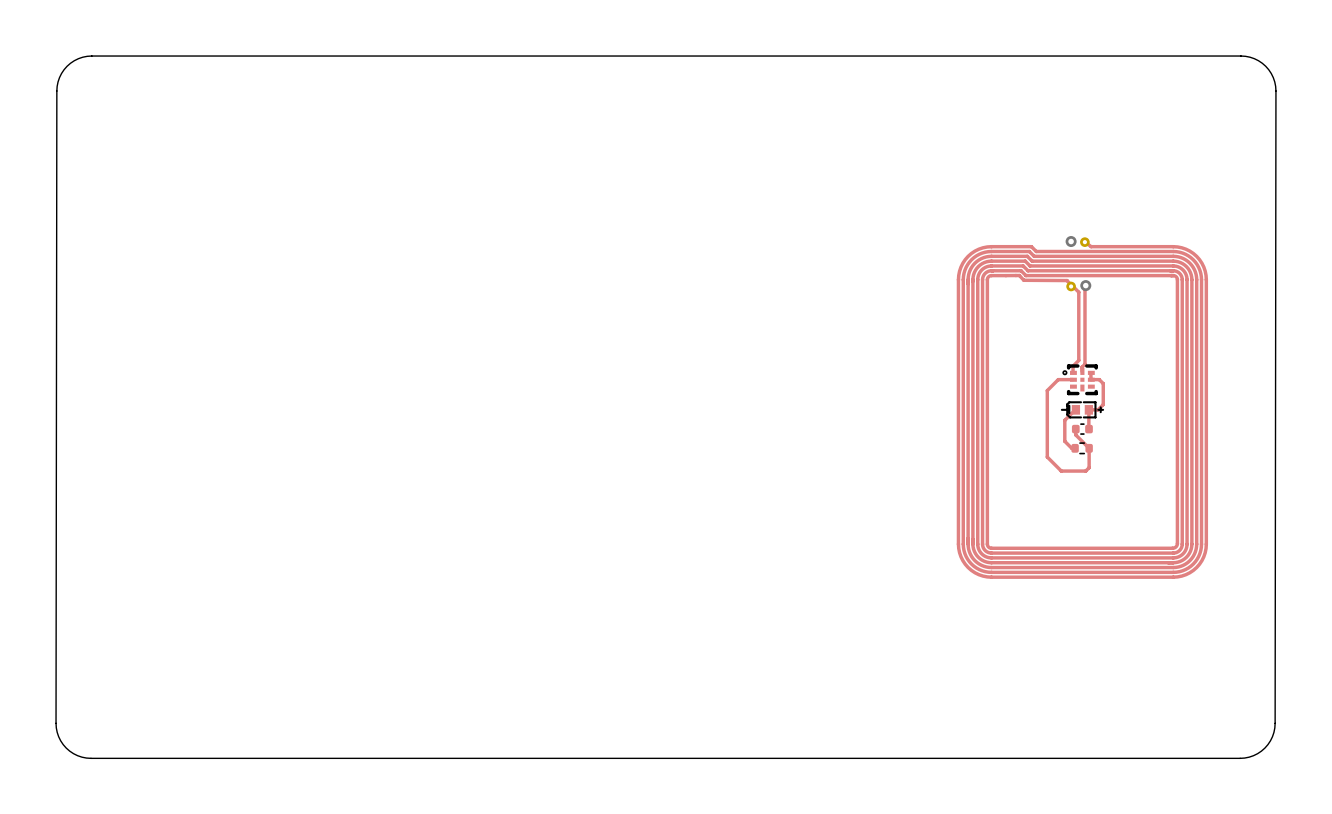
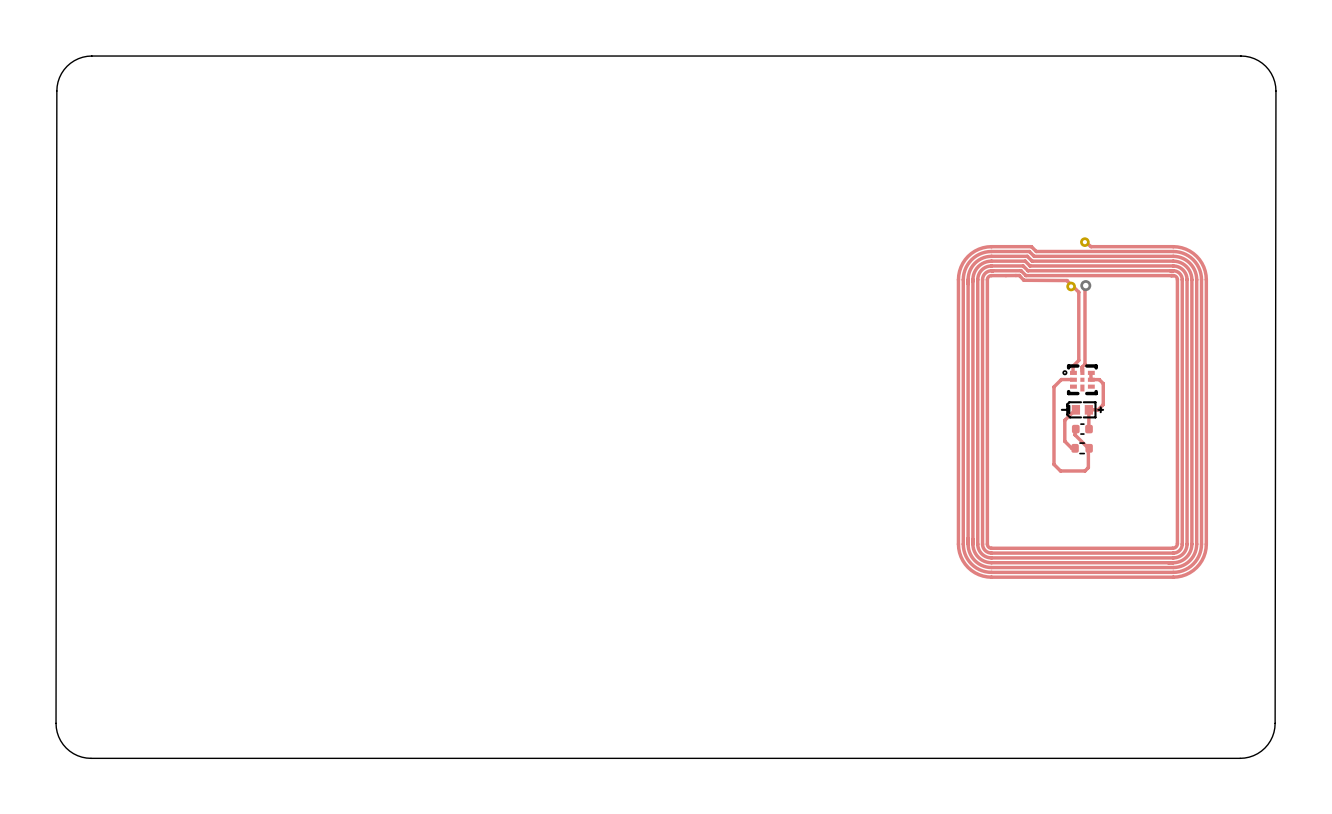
via: (1071, 241) -> none
track: none -> (1072, 379) (1061, 379) (1053, 386) (1053, 464) (1060, 470) (1085, 470) (1088, 467) (1088, 448) (1075, 434) (1075, 429)
track: (1073, 379) (1058, 379) (1047, 390) (1047, 457) (1061, 471) (1085, 471) (1089, 467) (1089, 448) (1075, 434) (1075, 429) -> none

